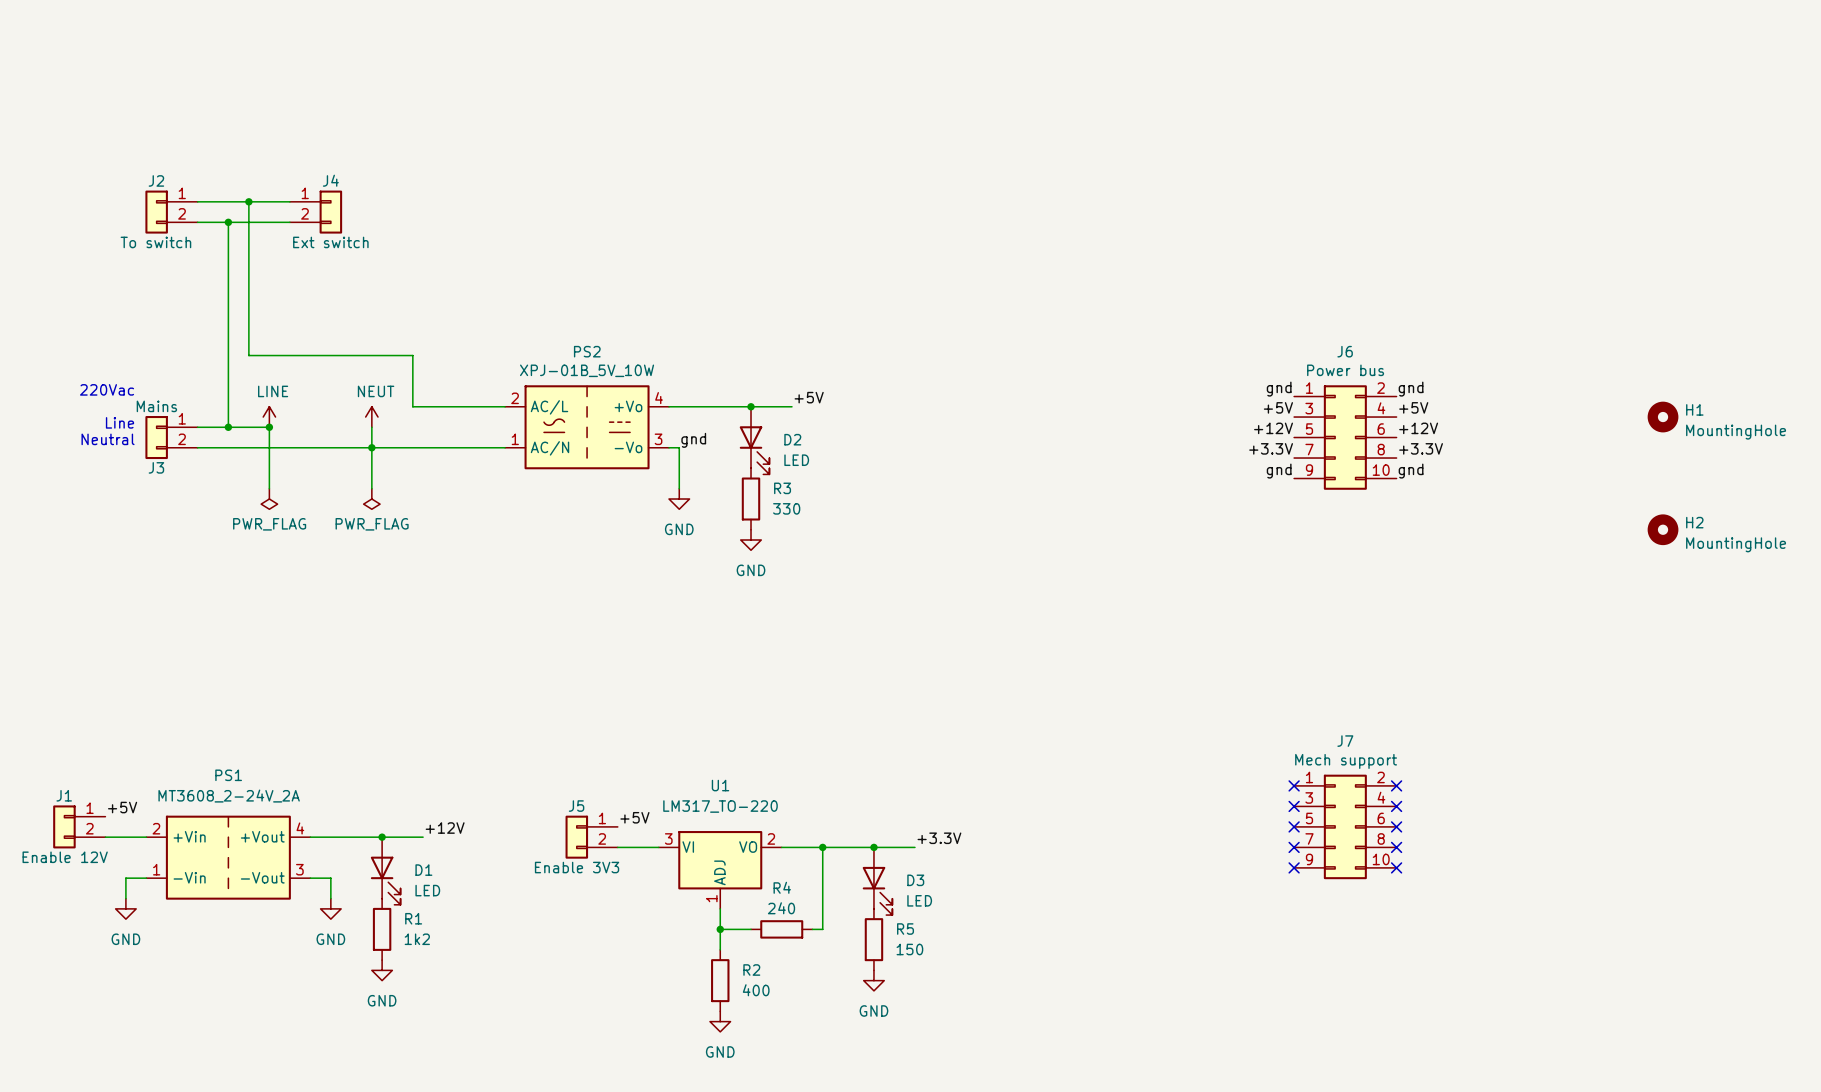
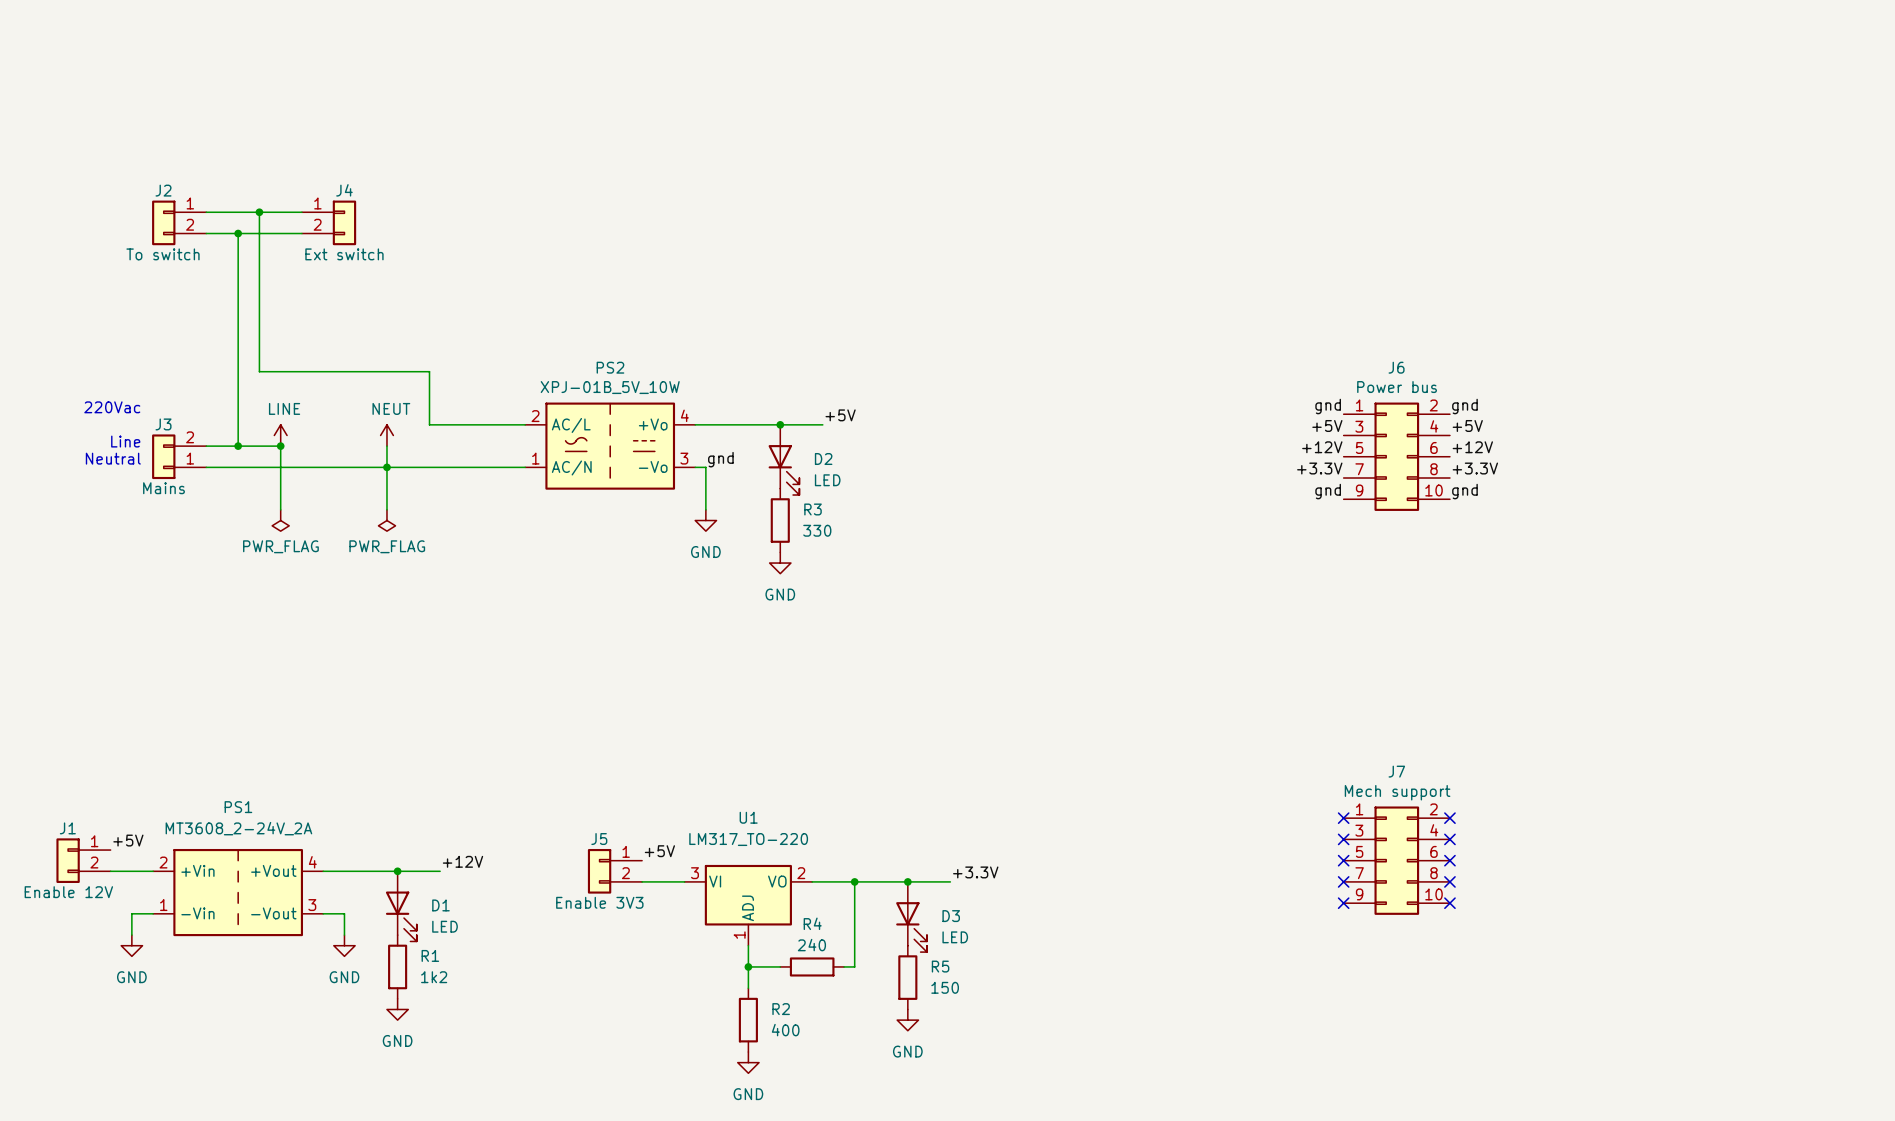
H1: MountingHole (1663, 417) -> none
J3 flip: as is (156, 437) -> up-down (163, 456)
H2: MountingHole (1663, 529) -> none

